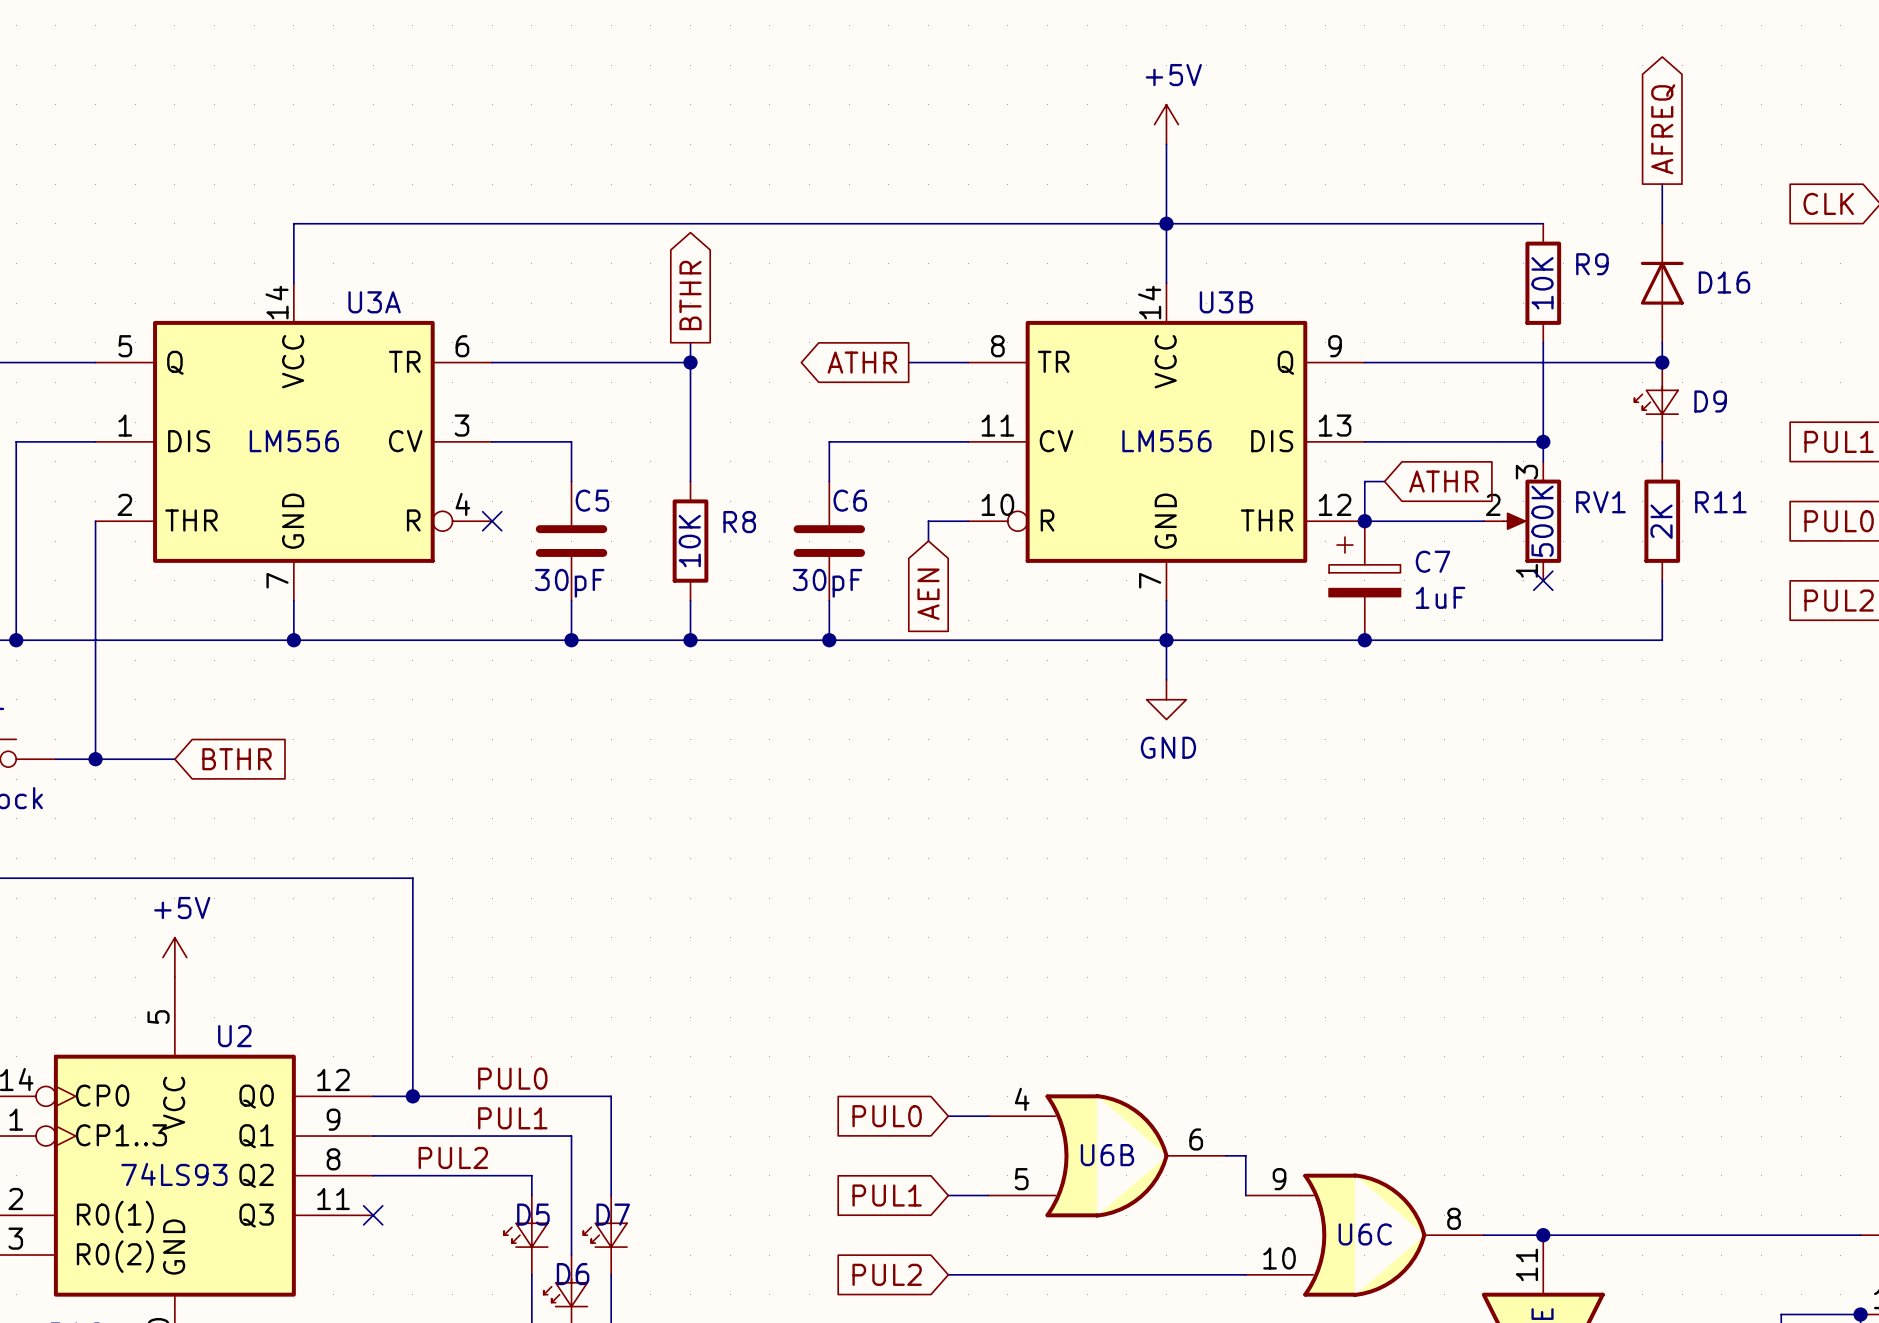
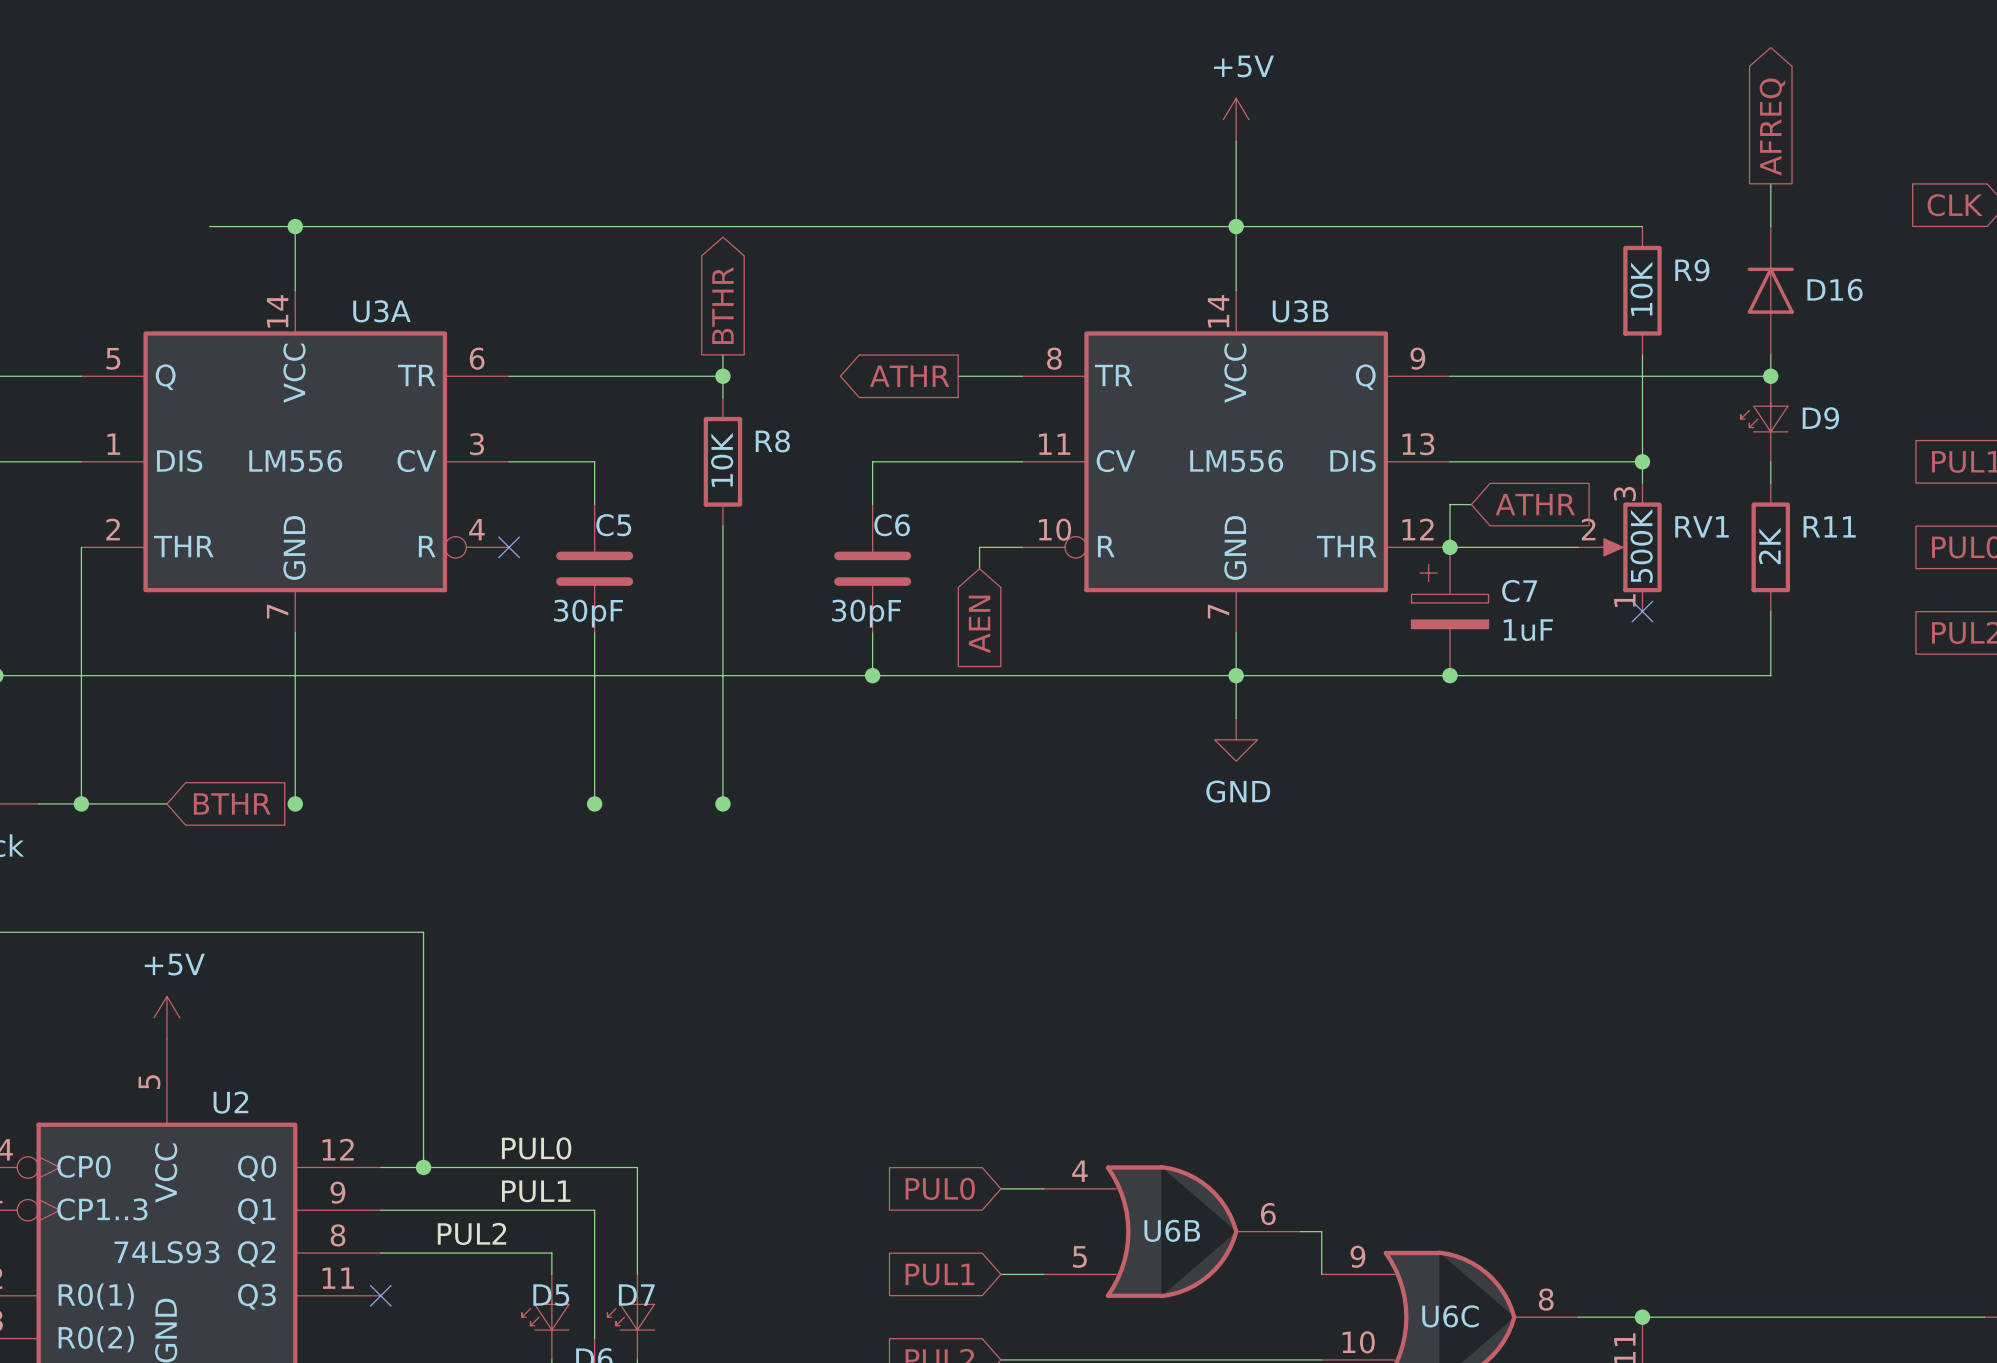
wire: none -> (209, 226) (295, 226)
junction: none -> (295, 226)
wire: (690, 382) (690, 481) -> (722, 525) (722, 632)
R8 position: (690, 541) -> (722, 461)
wire: none -> (295, 675) (295, 803)
junction: (293, 640) -> none
wire: none -> (594, 675) (594, 803)
junction: (571, 640) -> none
wire: none -> (722, 675) (722, 803)
junction: (690, 640) -> none
junction: none -> (295, 803)
junction: none -> (594, 803)
junction: none -> (722, 803)

